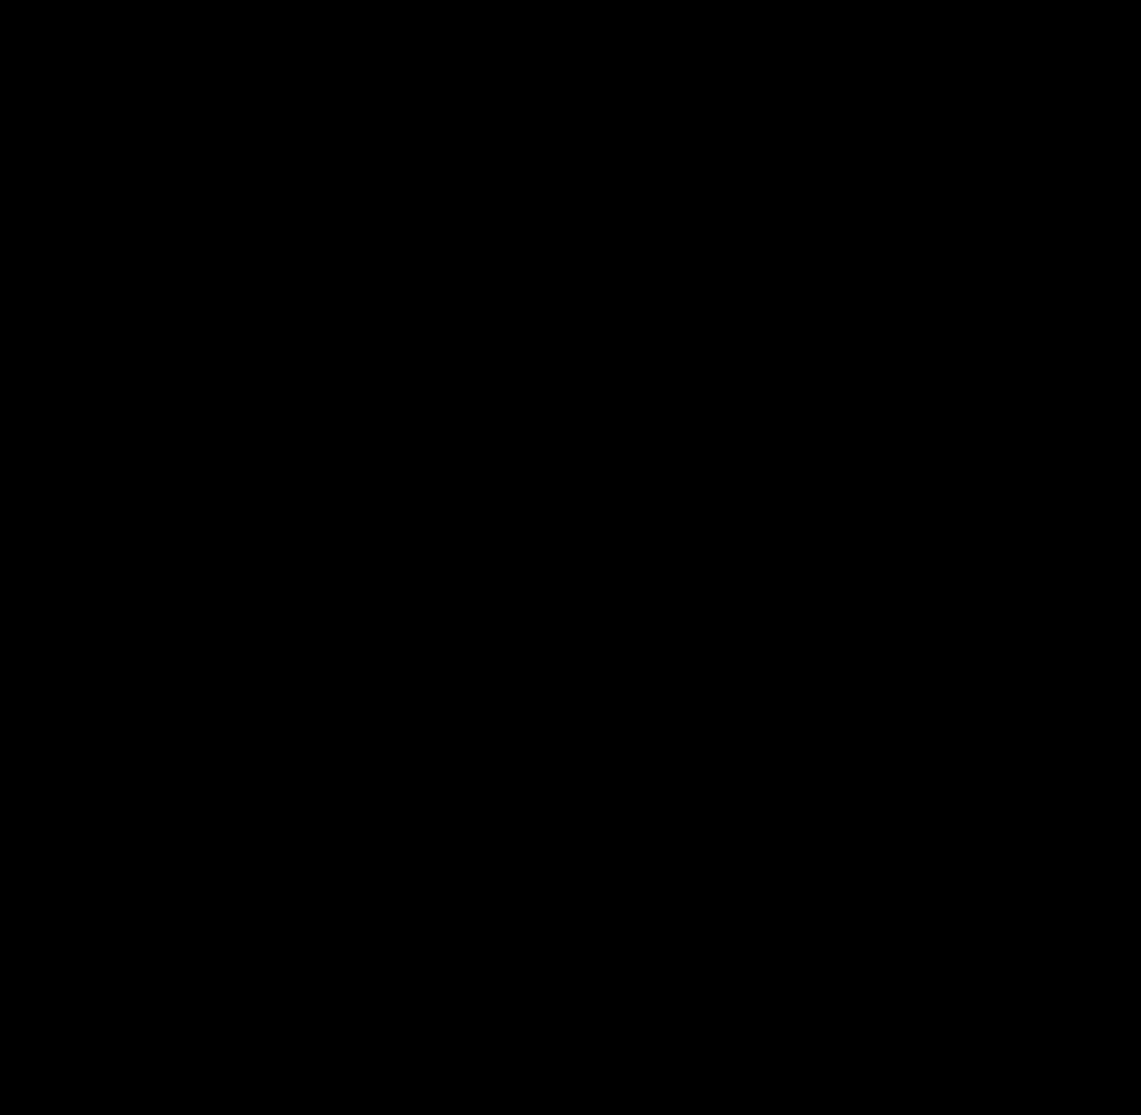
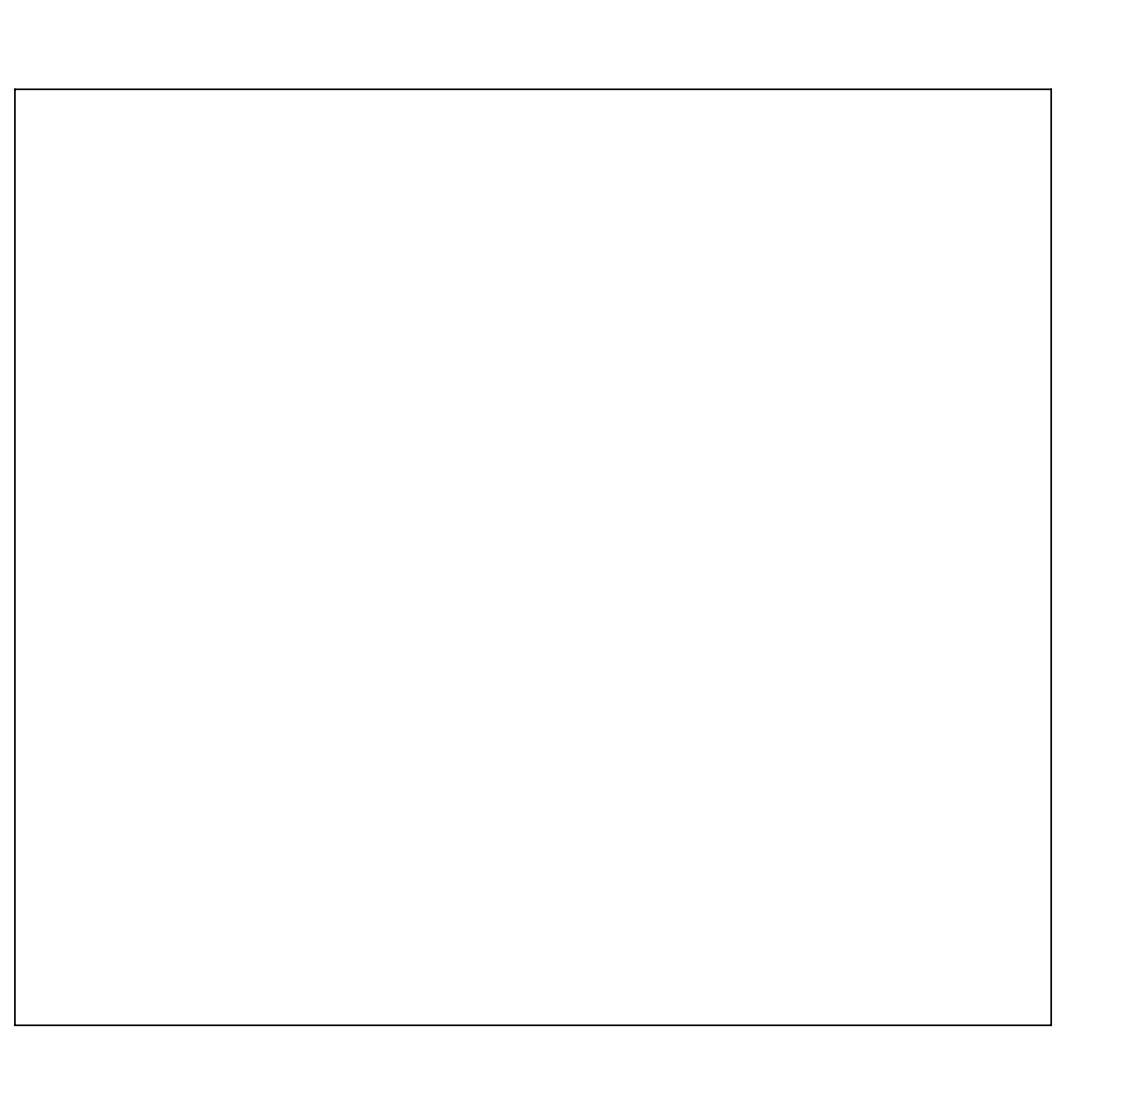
board edge: none -> (1051, 89) (14, 89) (14, 1025) (1051, 1025) (1051, 89)

